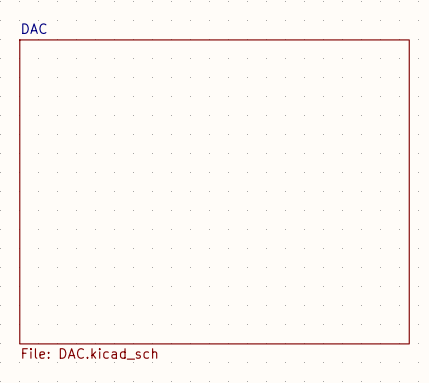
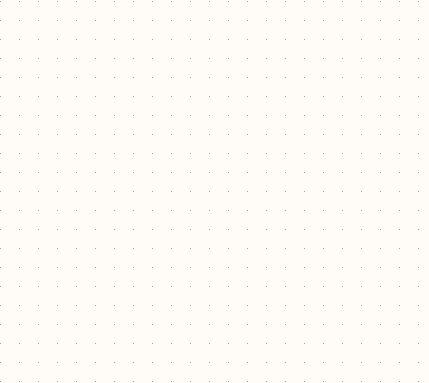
sheet DAC: File: DAC.kicad_sch (214, 191) -> none

